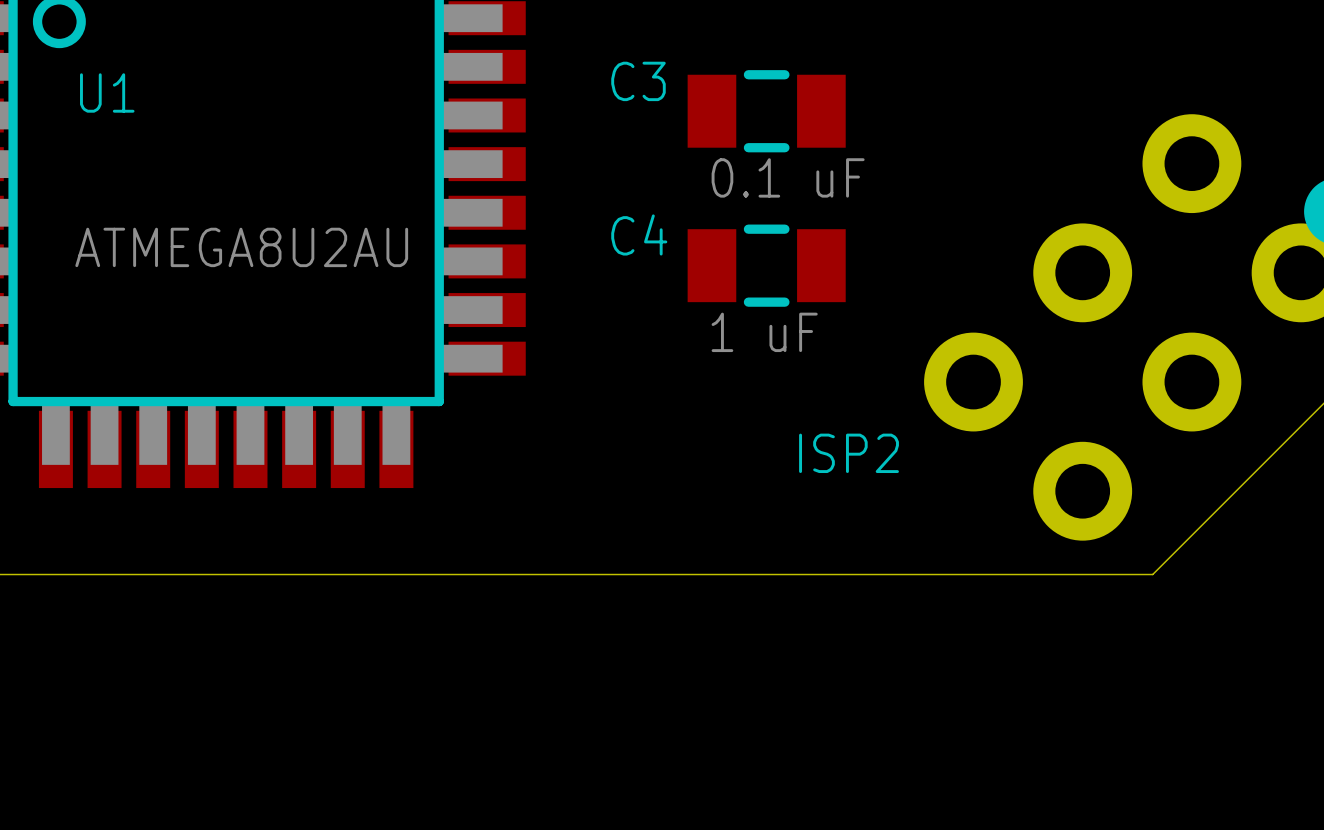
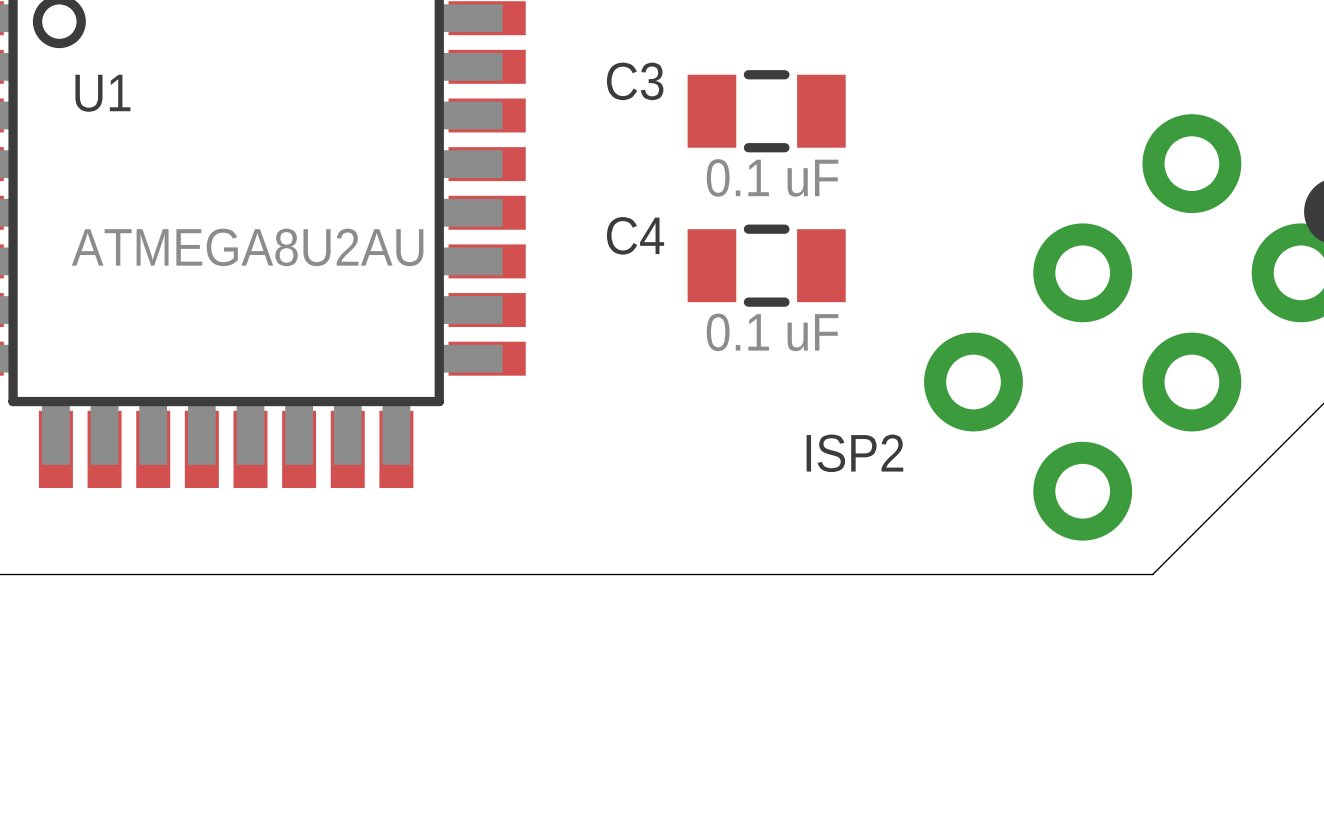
C4 value: 1 uF (764, 332) -> 0.1 uF (772, 332)

